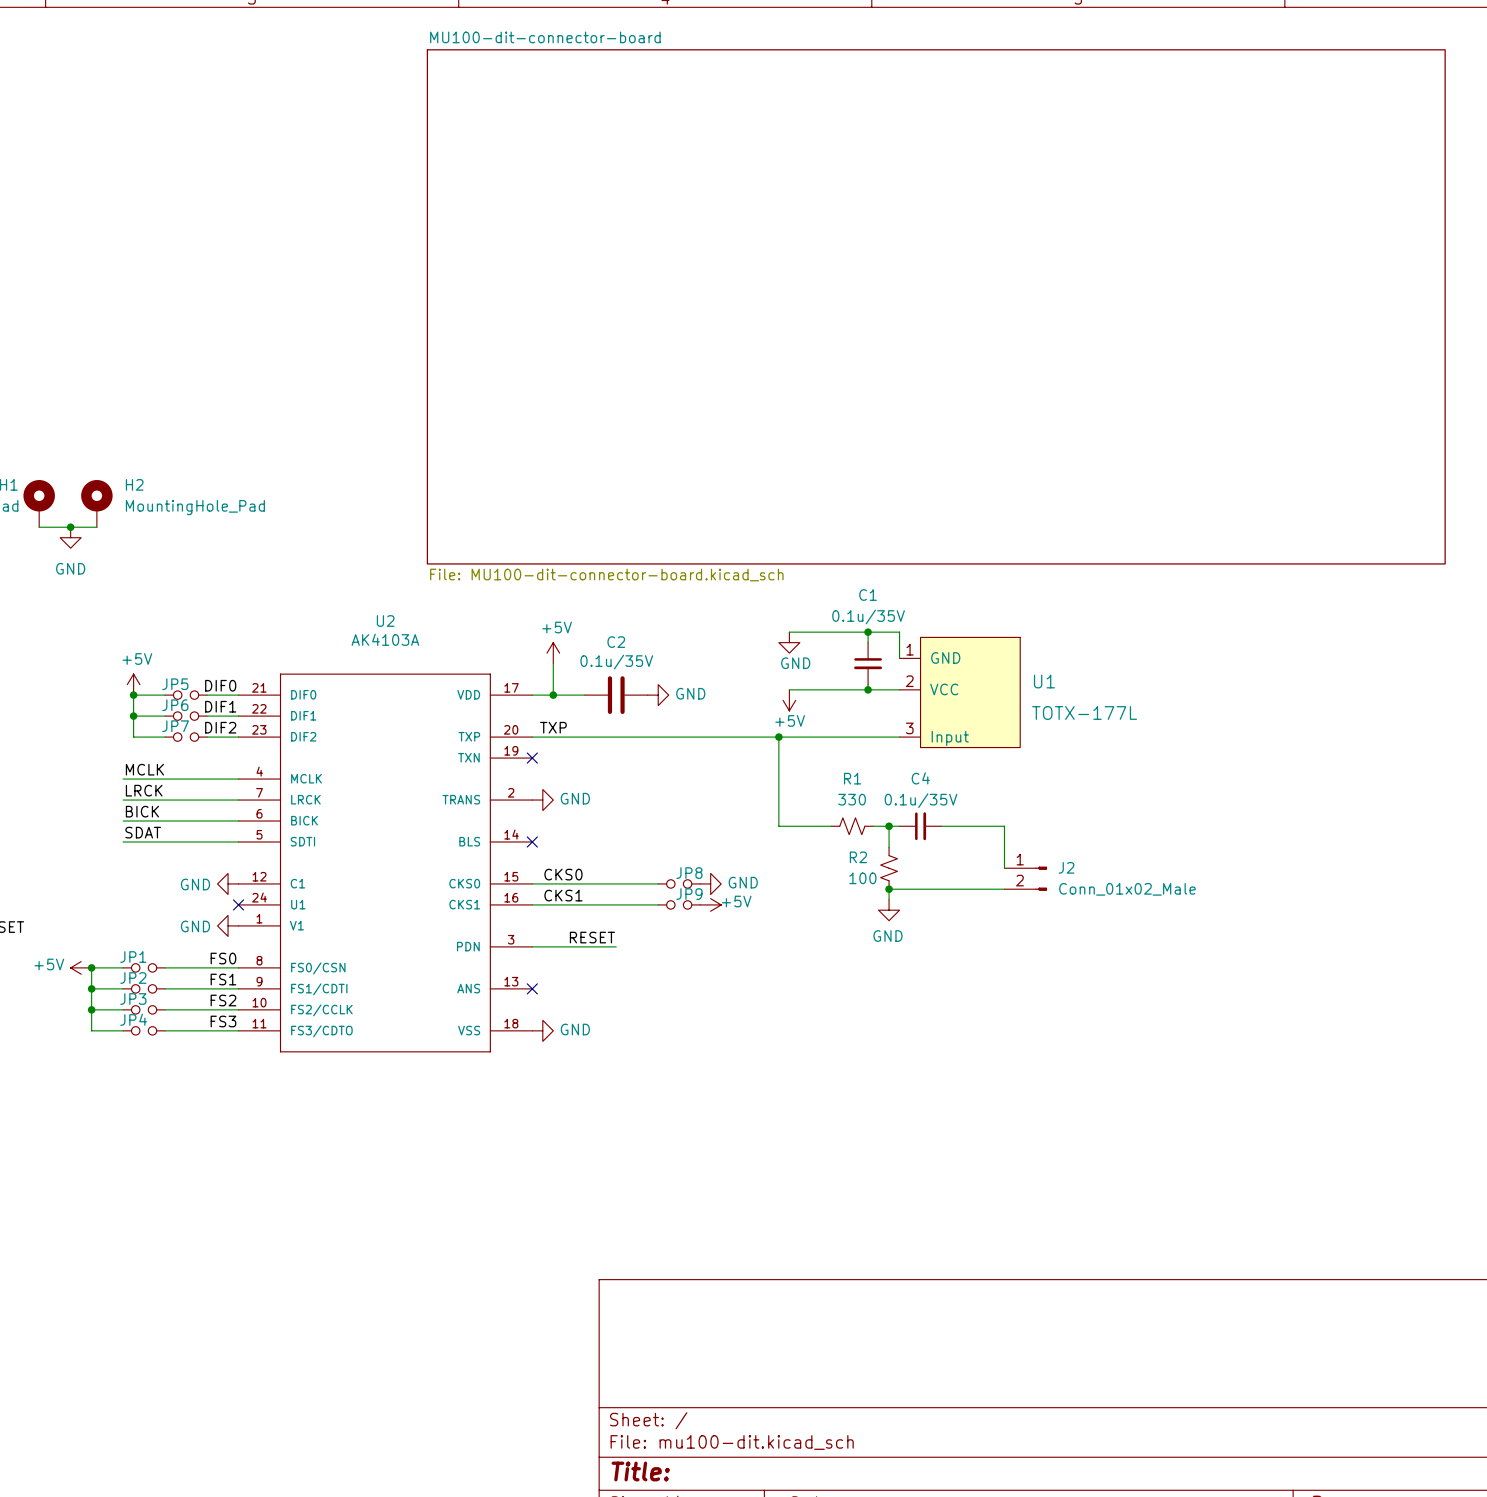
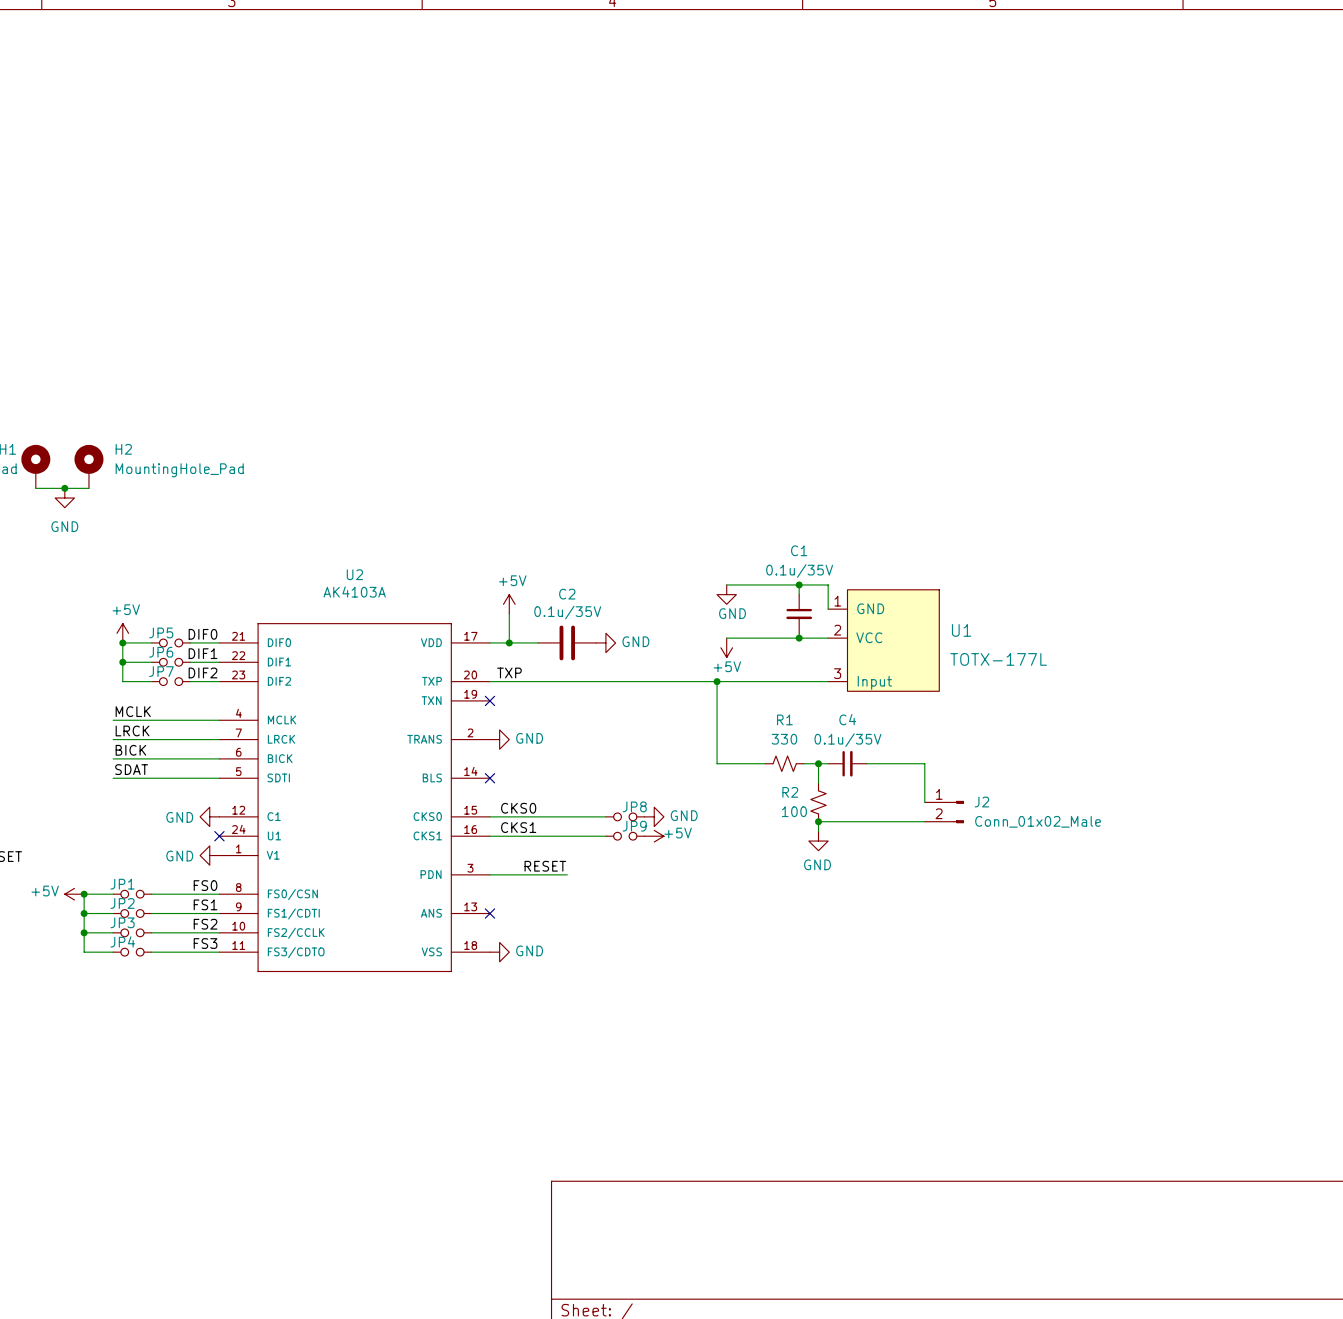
sheet MU100-dit-connector-board: File: MU100-dit-connector-board.kicad_sch (936, 306) -> none

